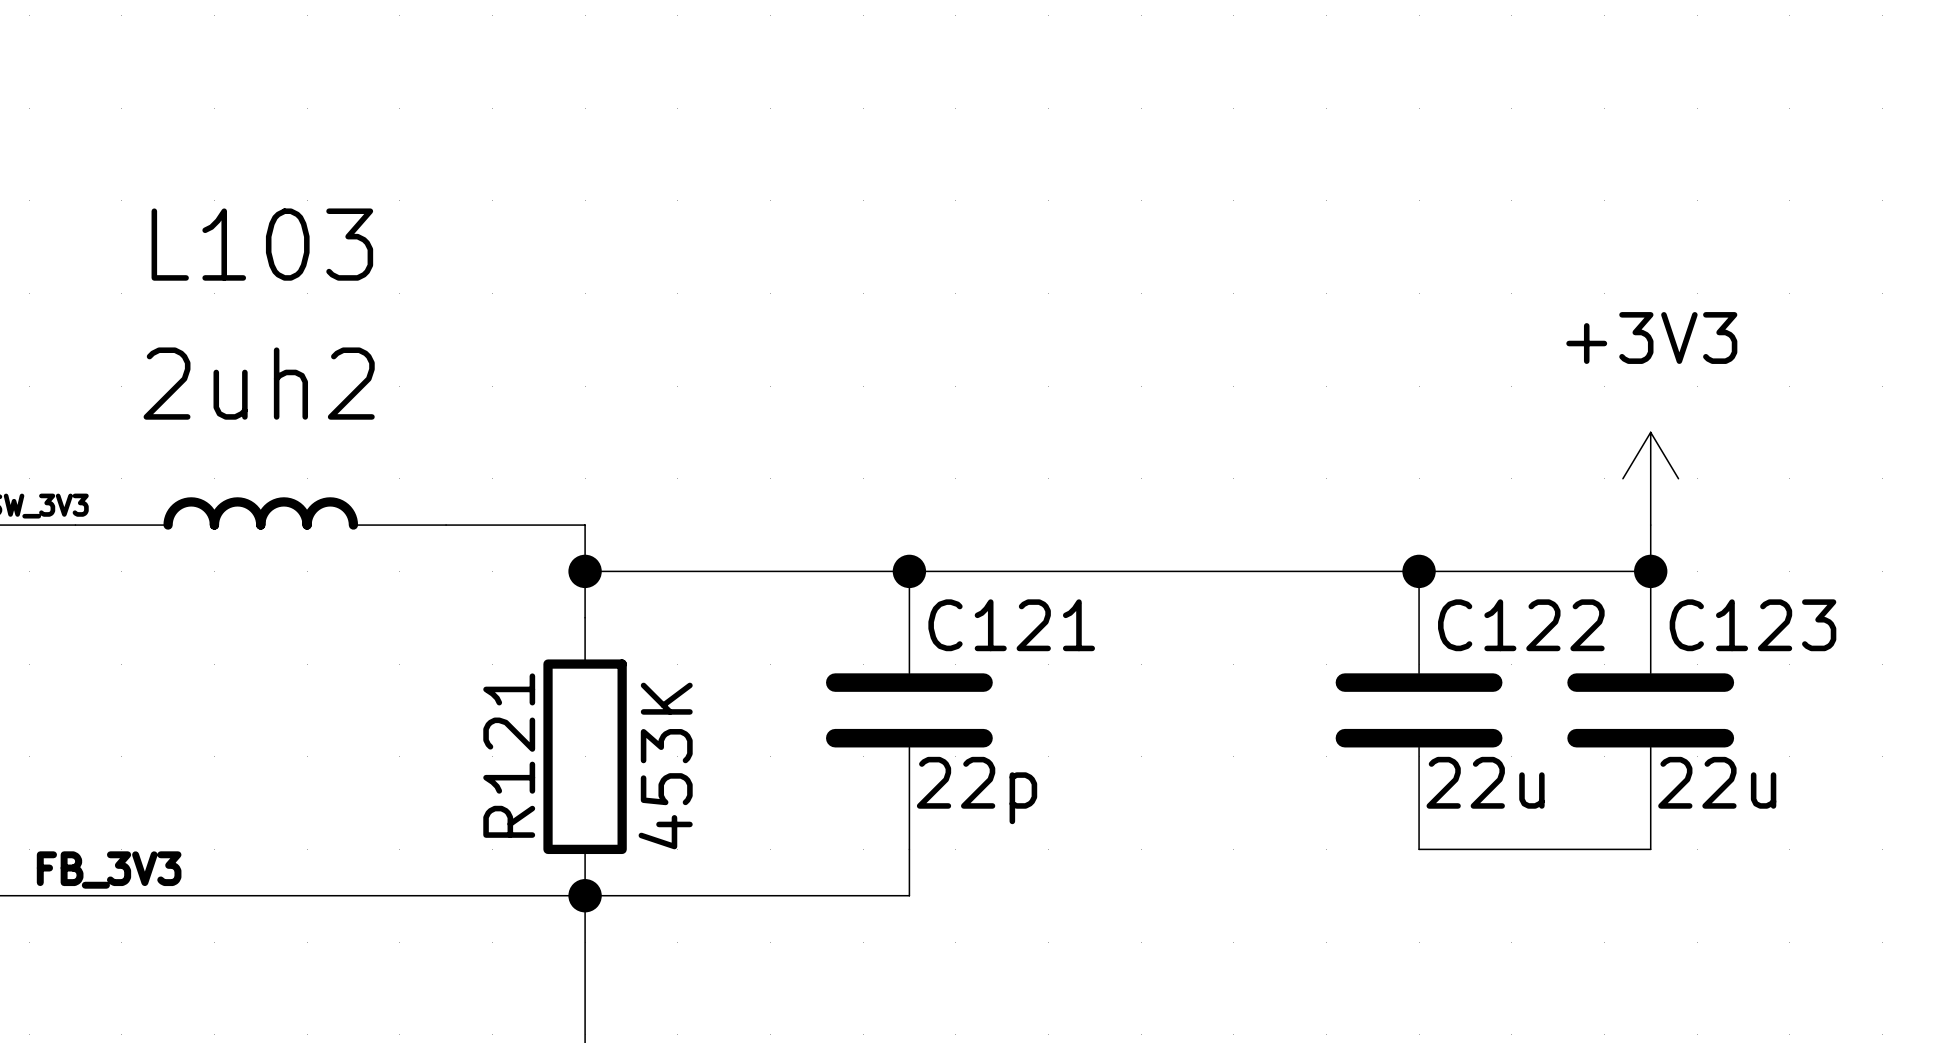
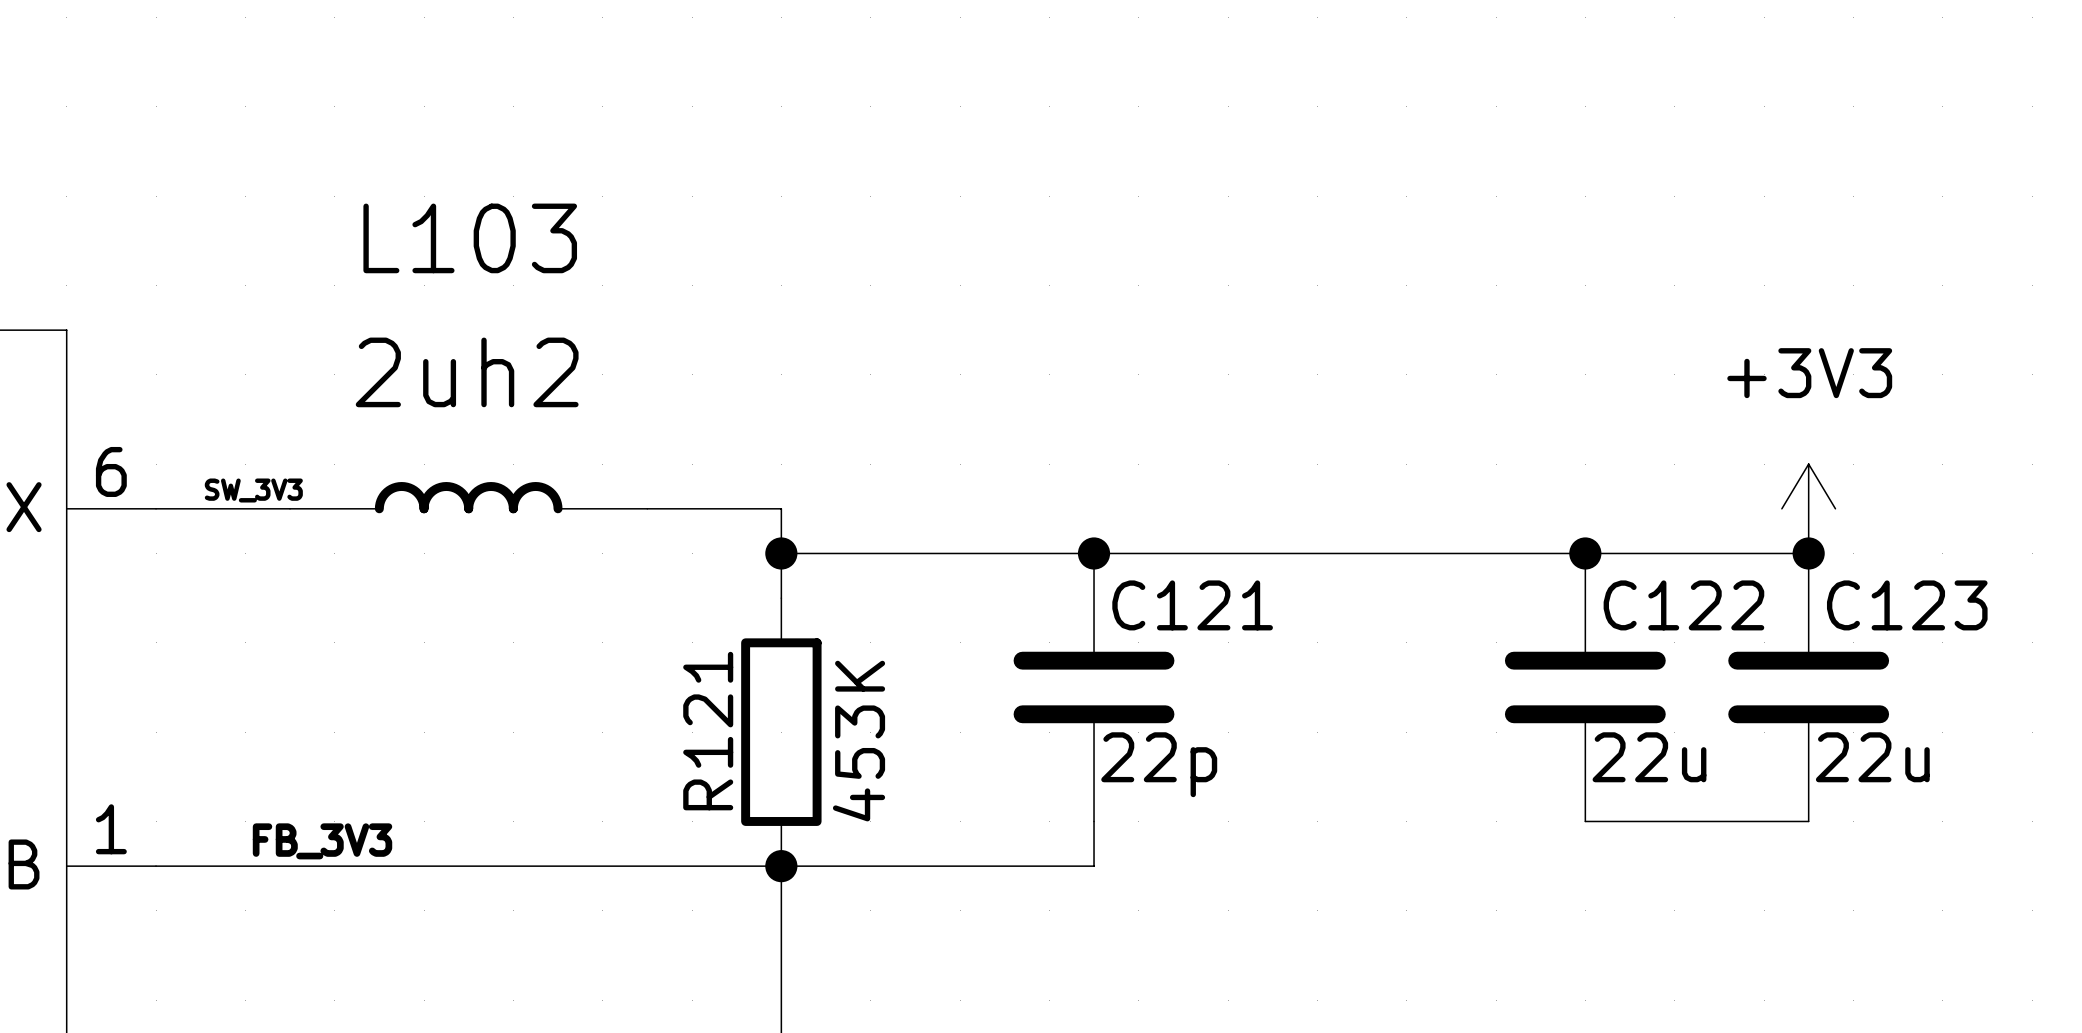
power symbol position: +3V3 (1650, 478) -> +3V3 (1808, 508)

